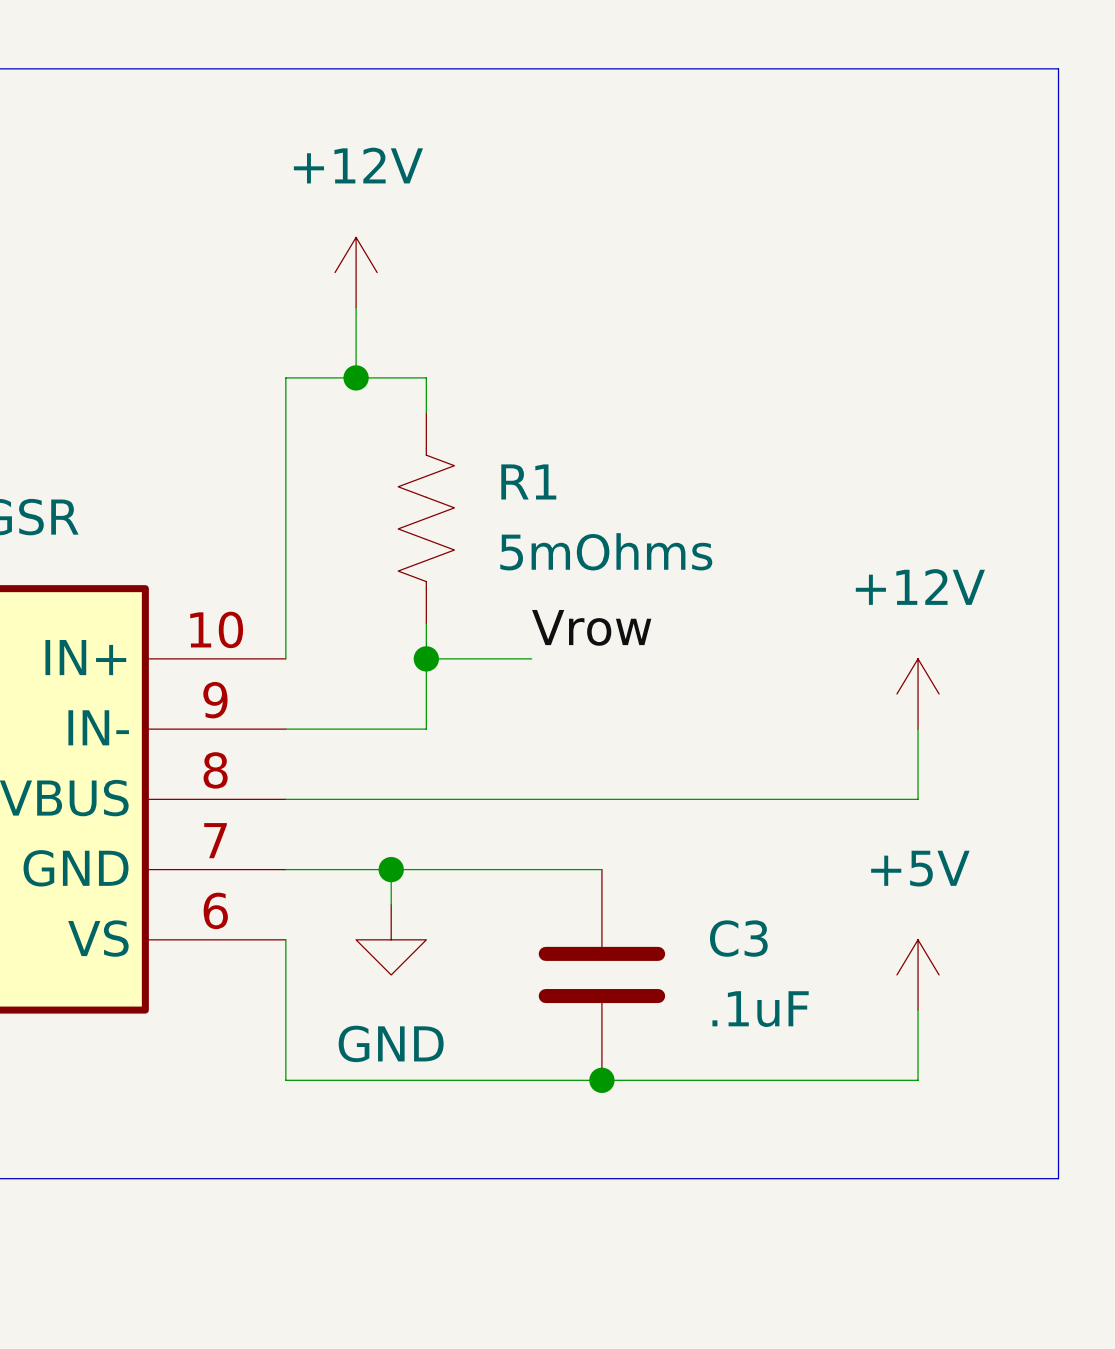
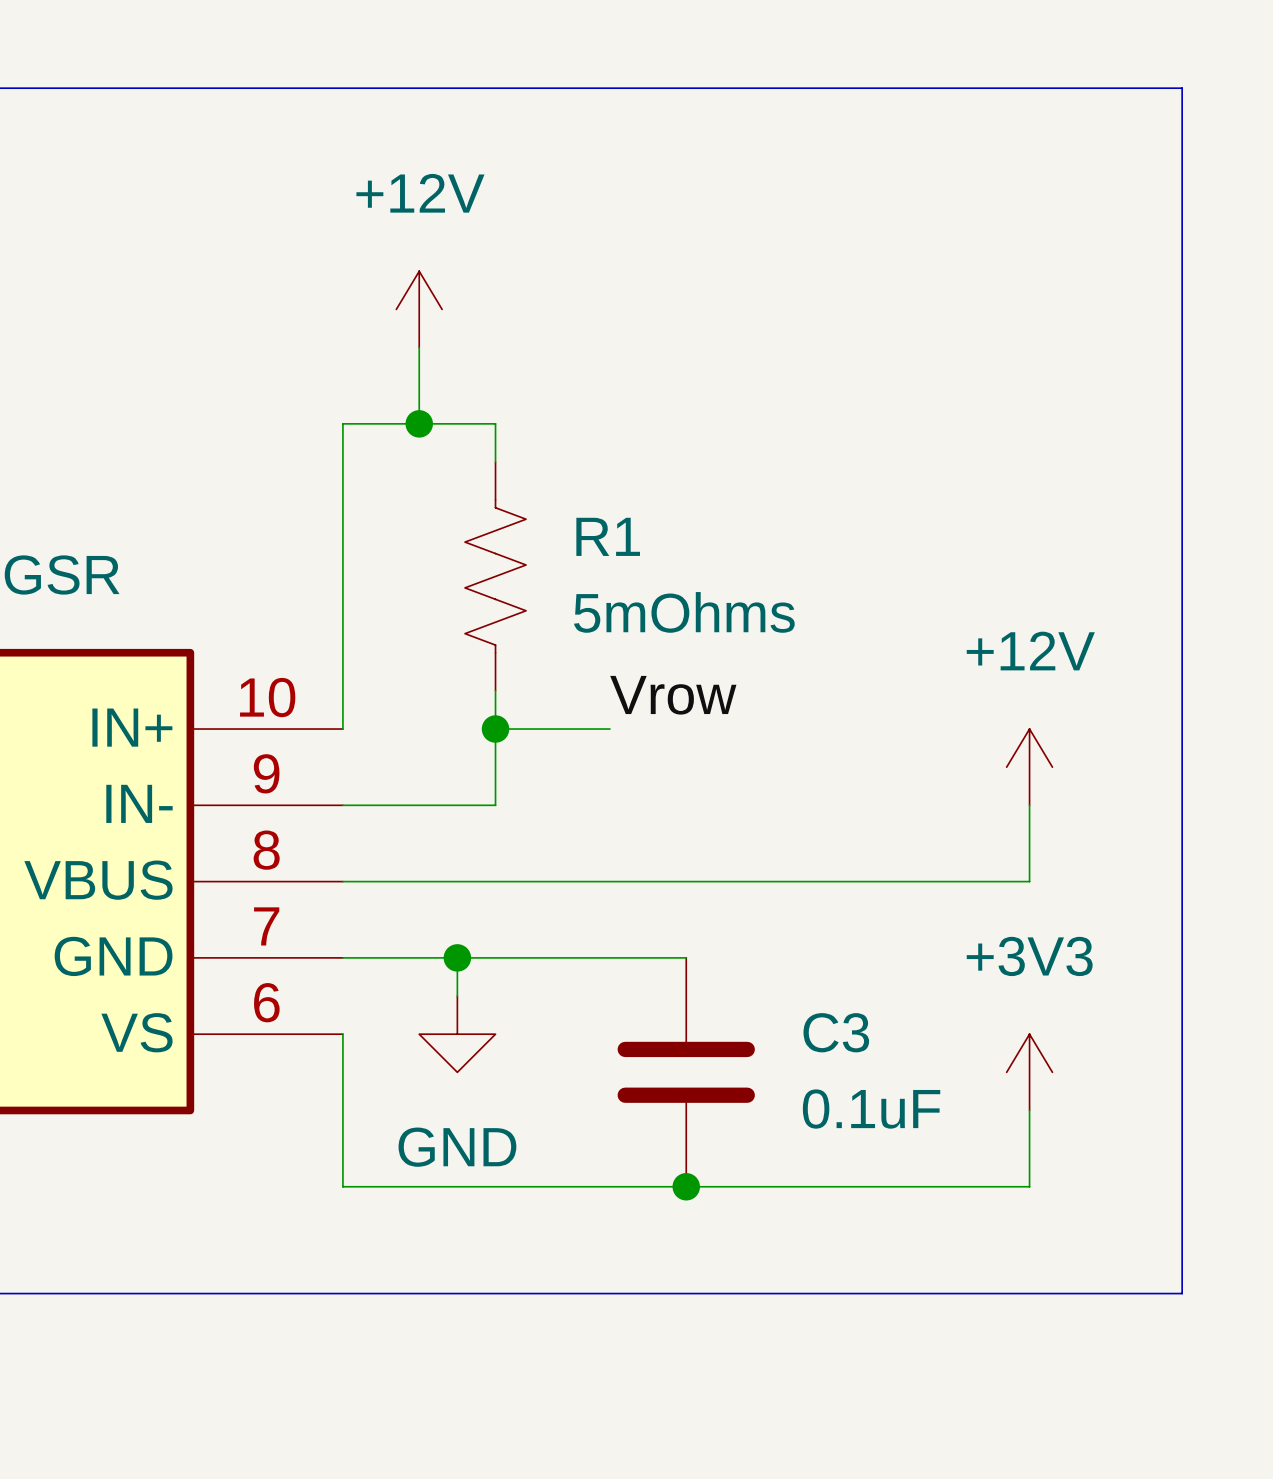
power symbol: +5V (918, 974) -> +3V3 (1029, 1072)
C3 value: .1uF (760, 1009) -> 0.1uF (871, 1109)

